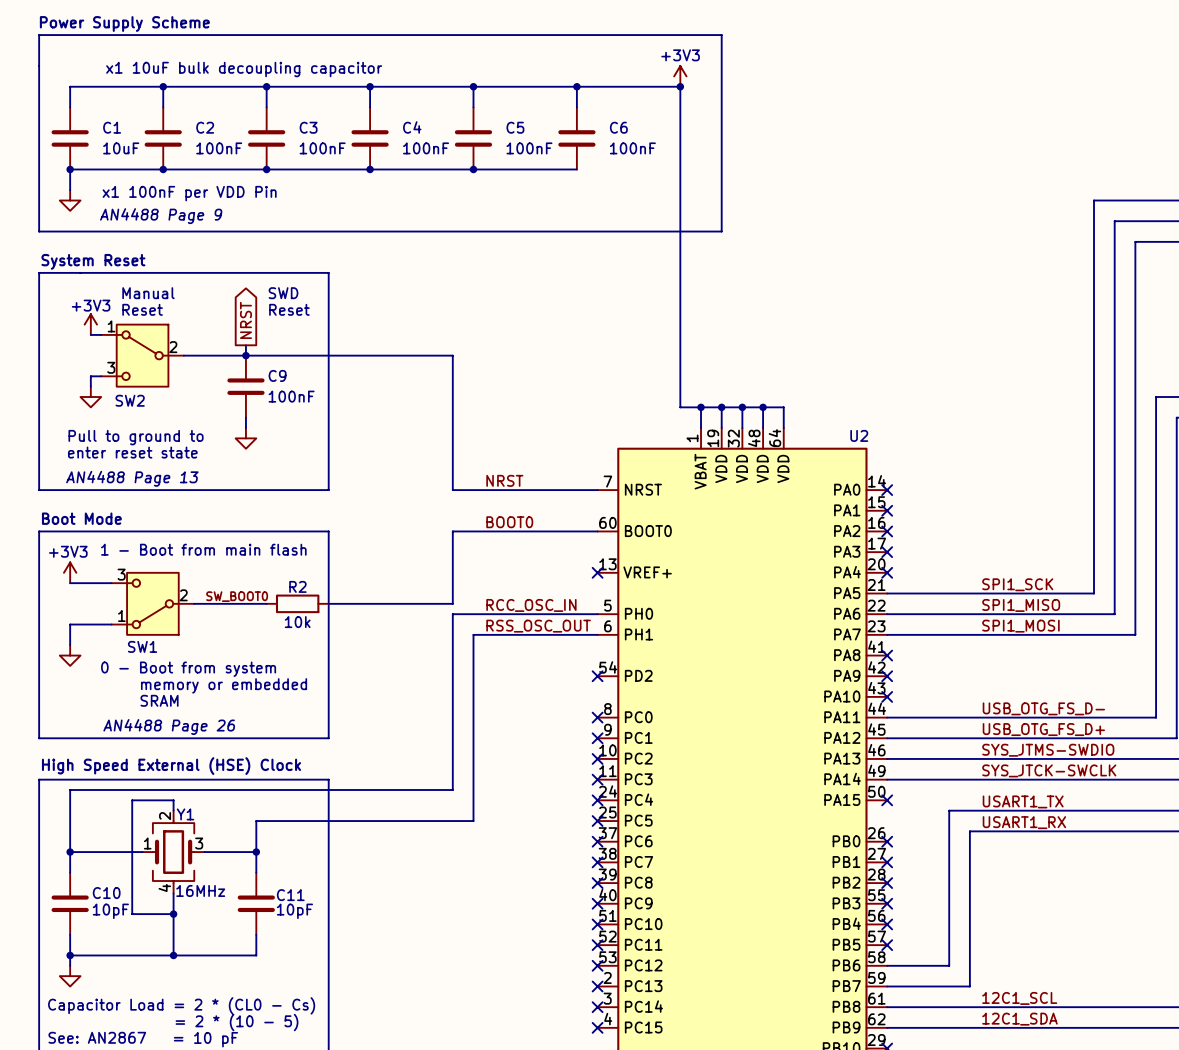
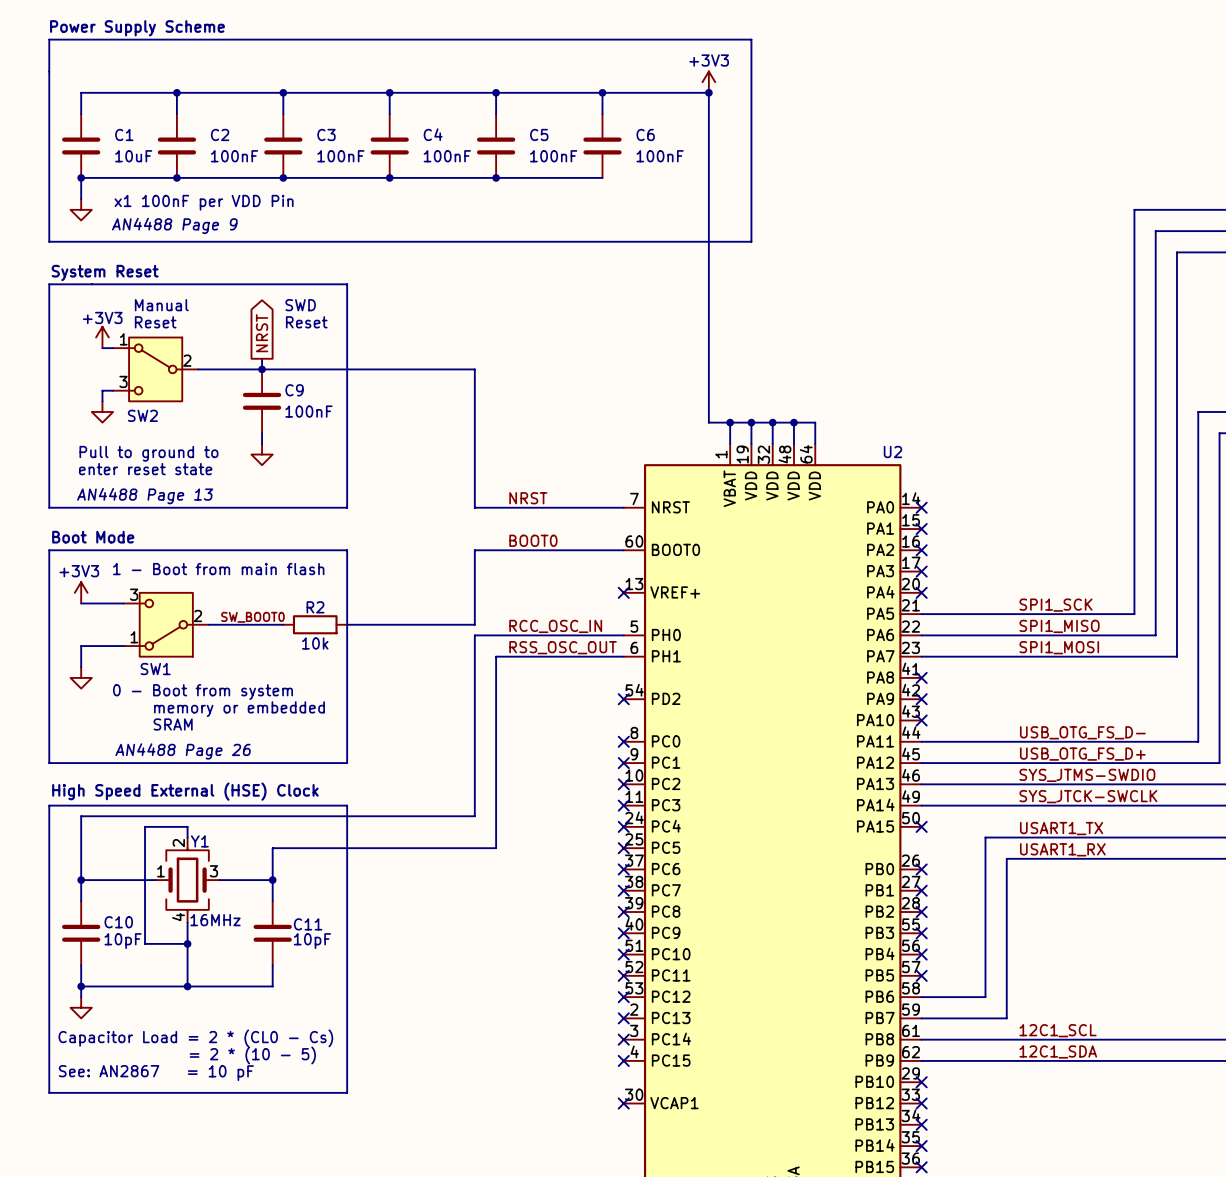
text: x1 10uF bulk decoupling capacitor (244, 69) -> none

